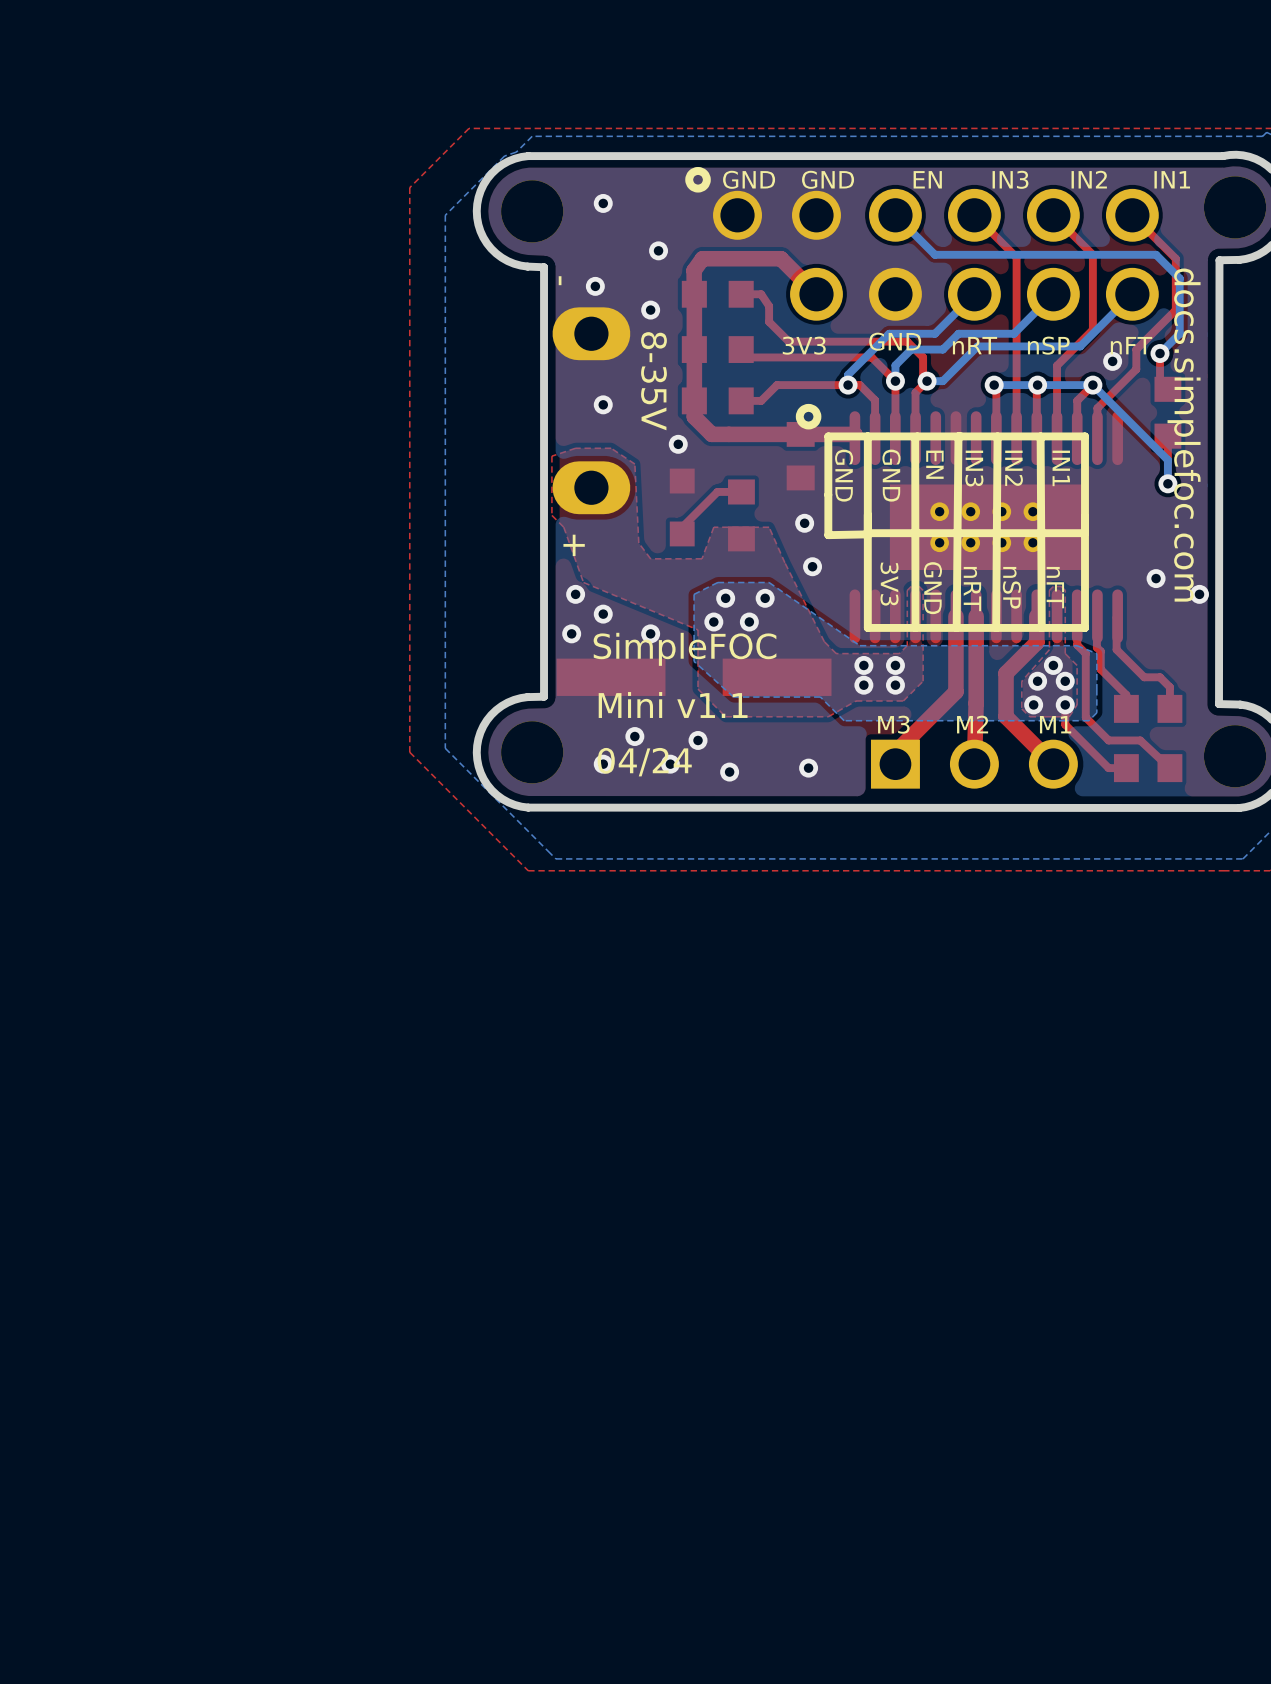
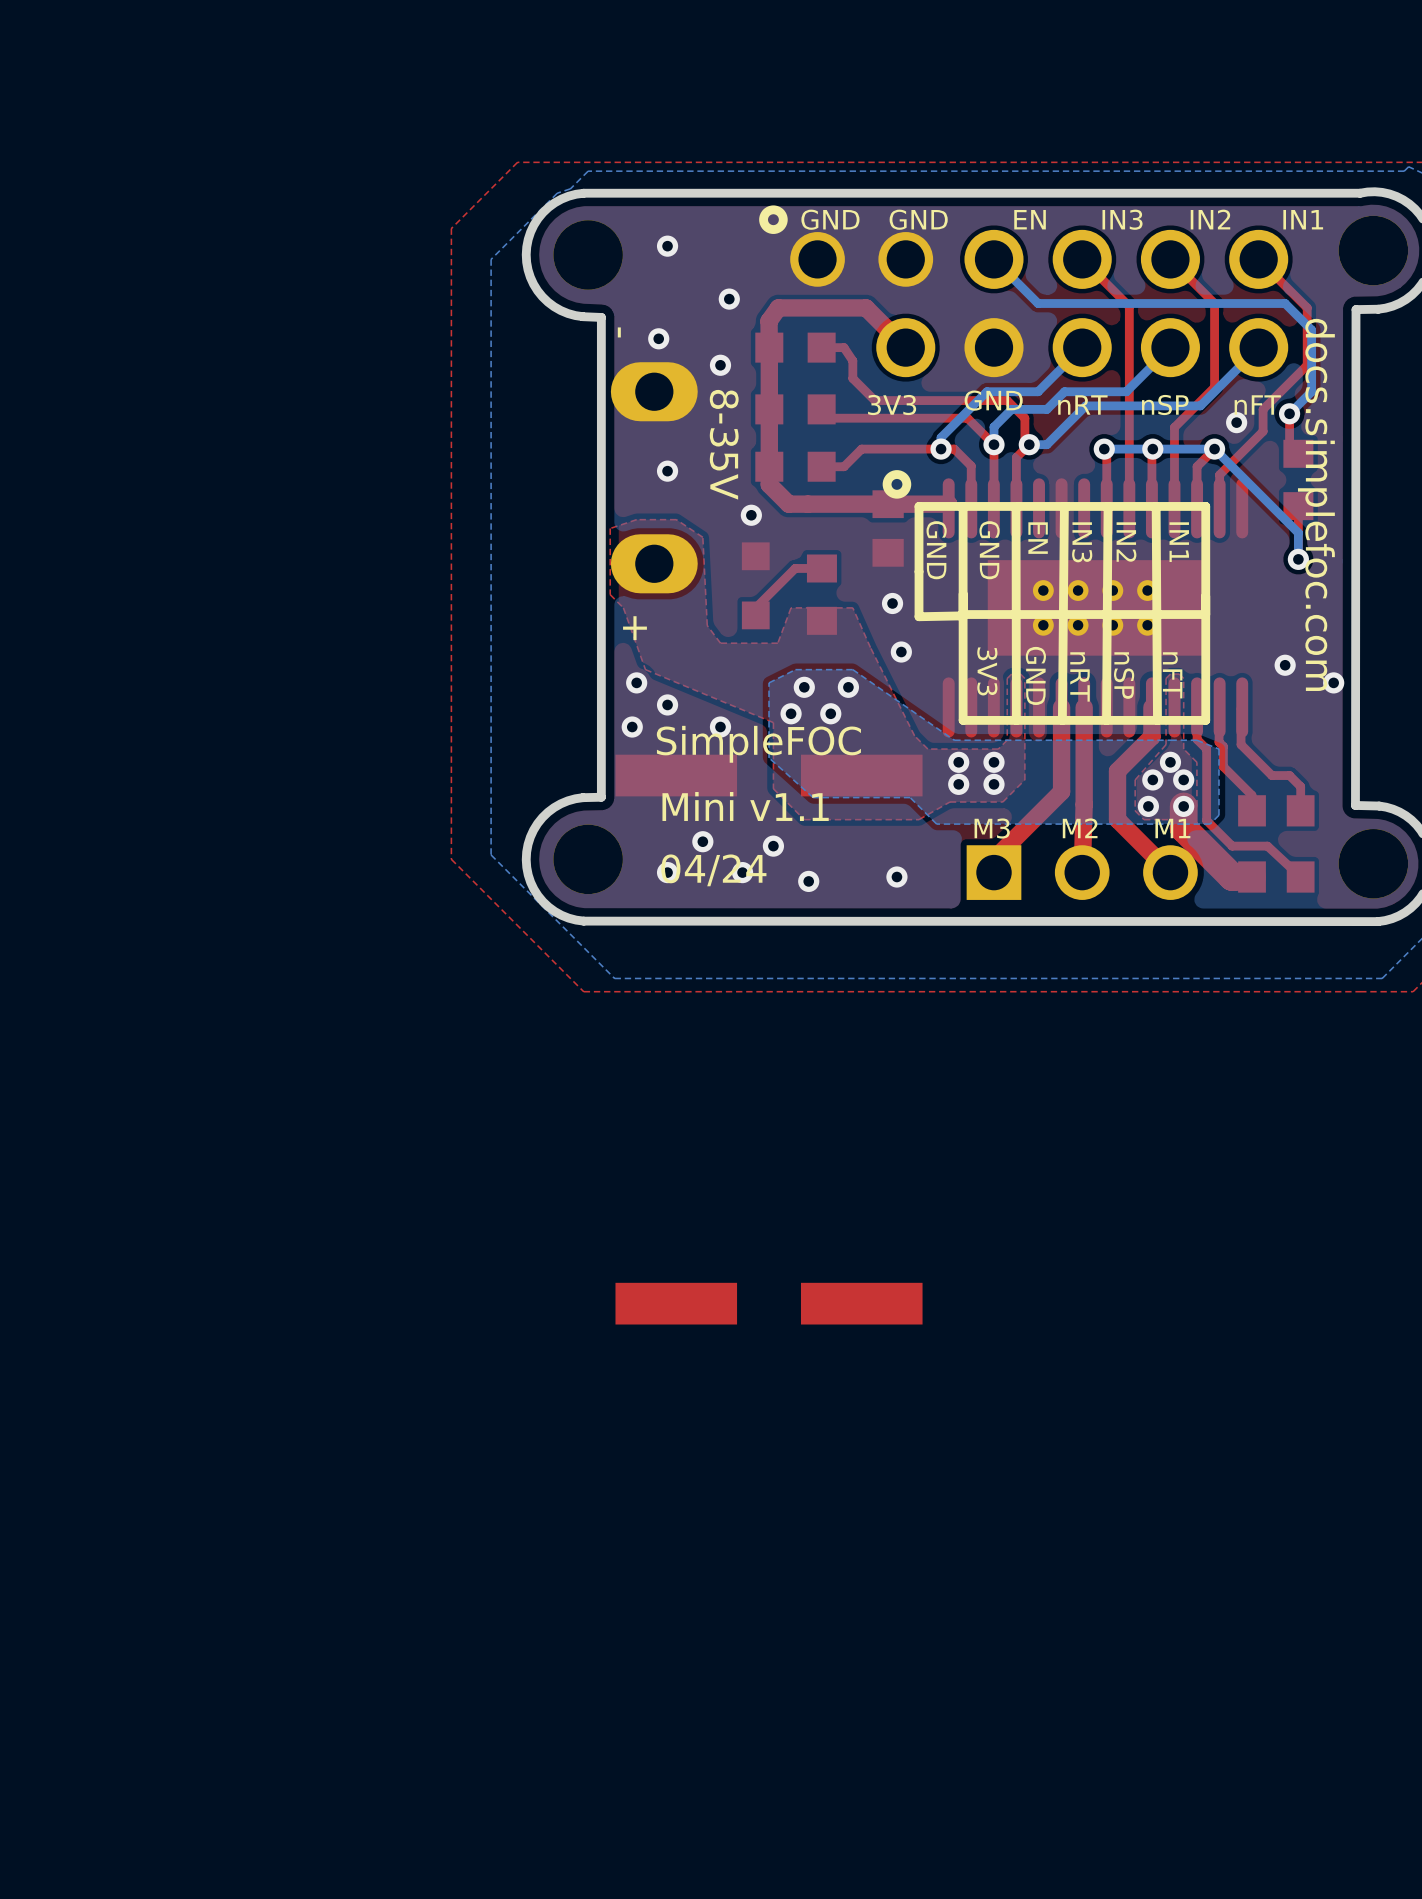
top track width: thin (1065, 704) (1065, 724) (1108, 768) (1126, 768) -> thick (1183, 806) (1183, 828) (1232, 877) (1252, 877)
part: none -> (769, 1303)

